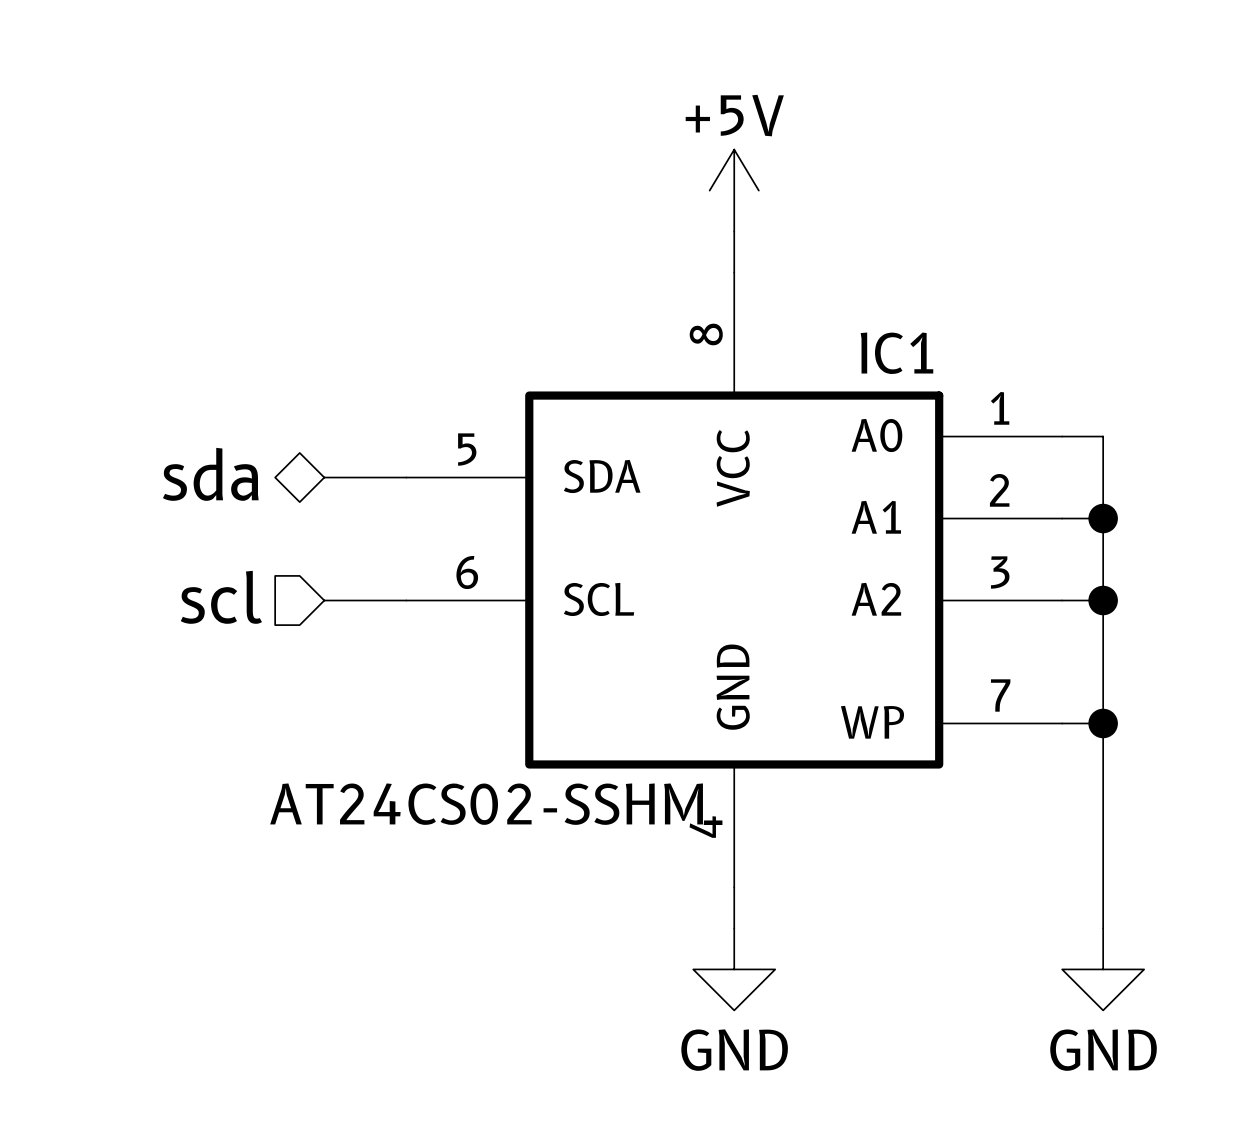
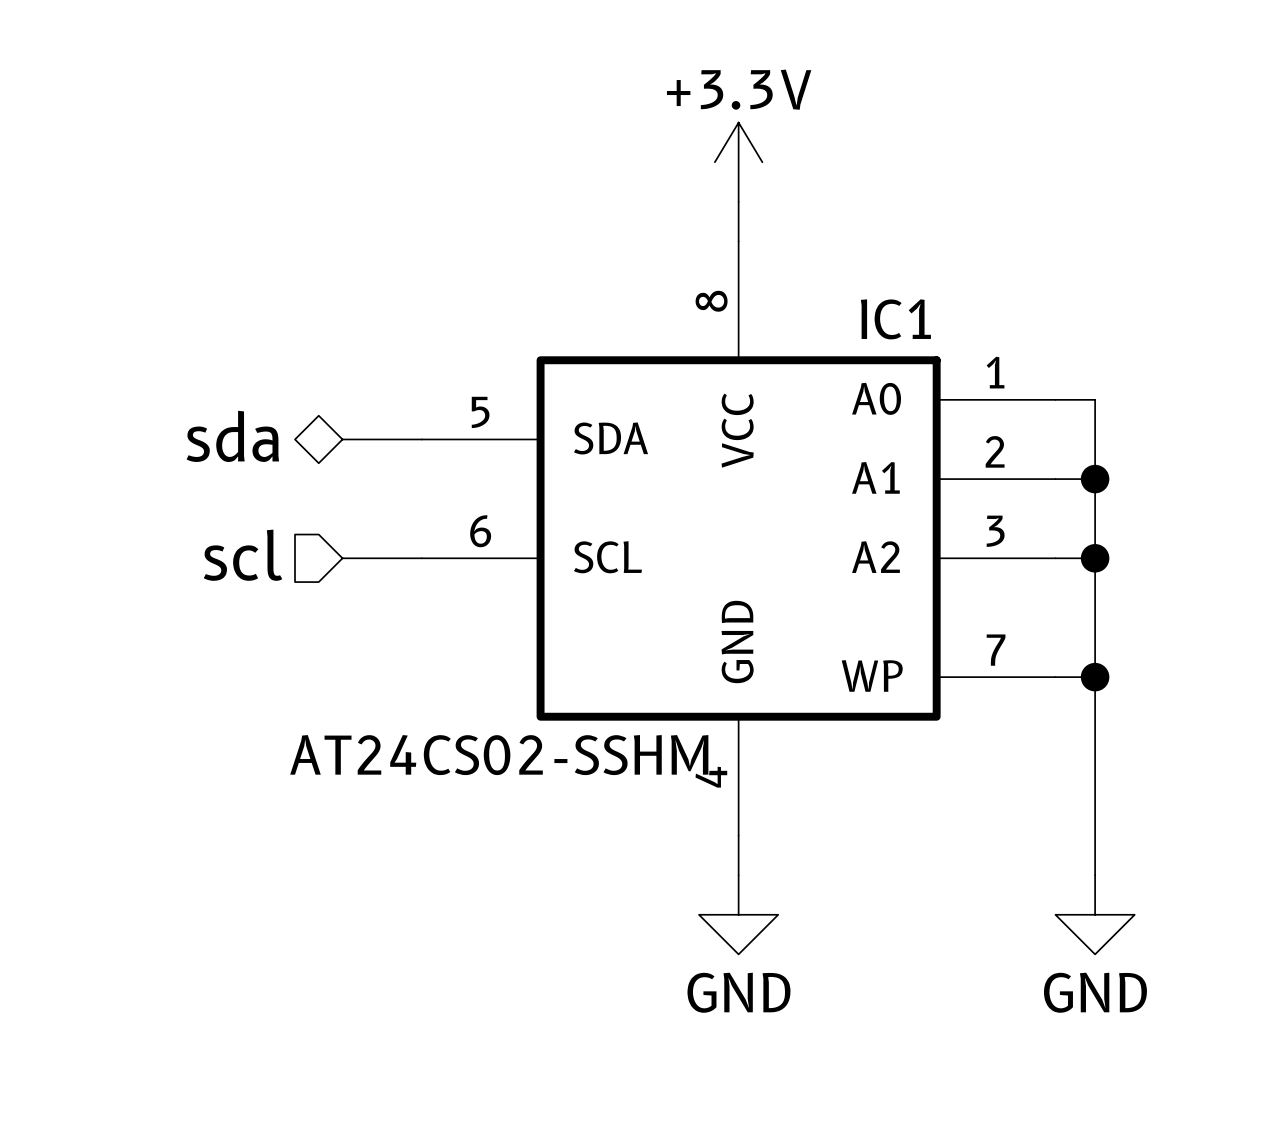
power symbol: +5V (734, 190) -> +3.3V (738, 162)

